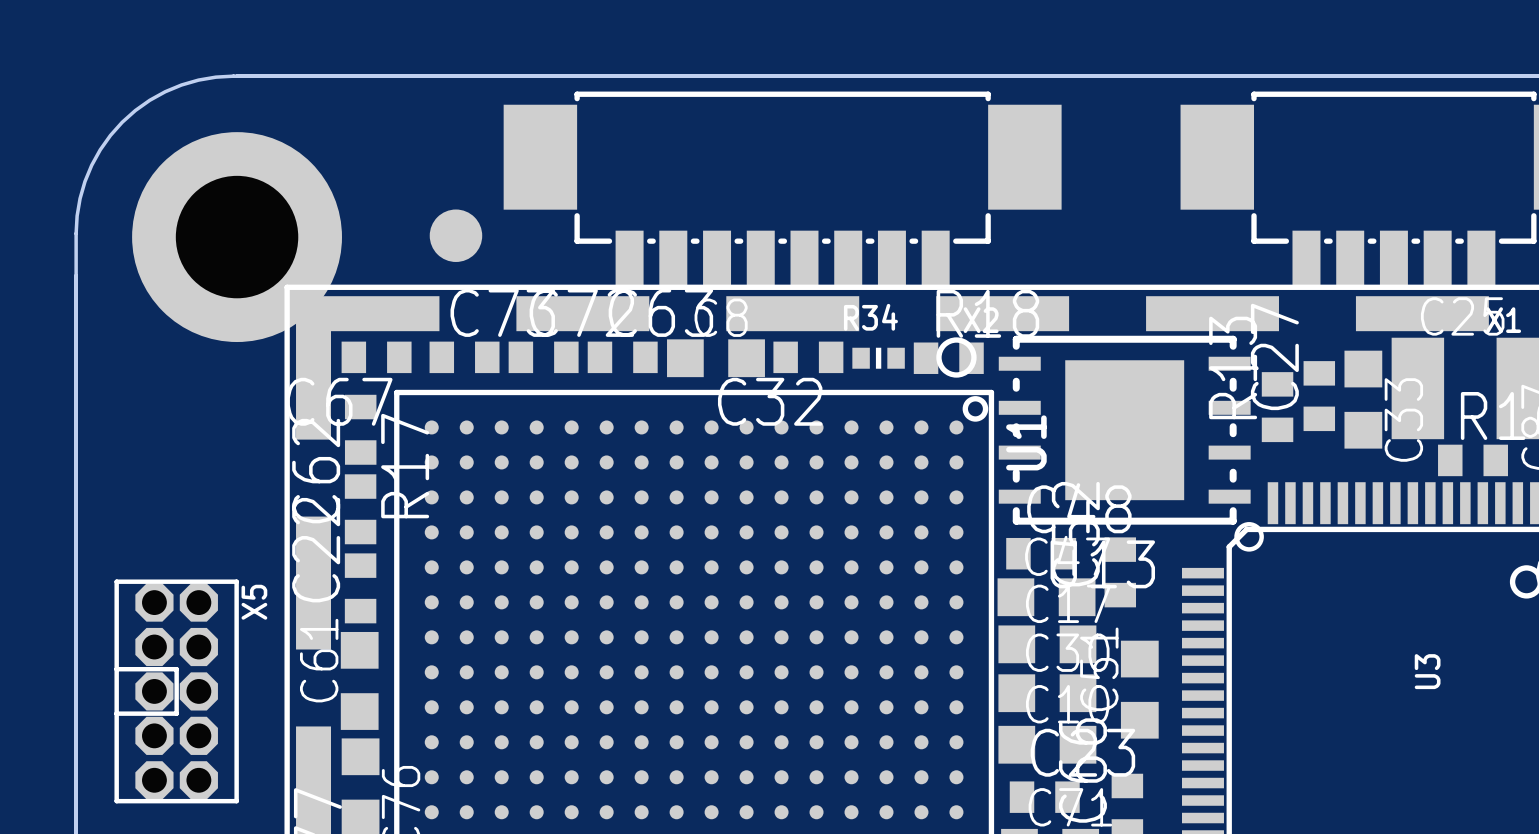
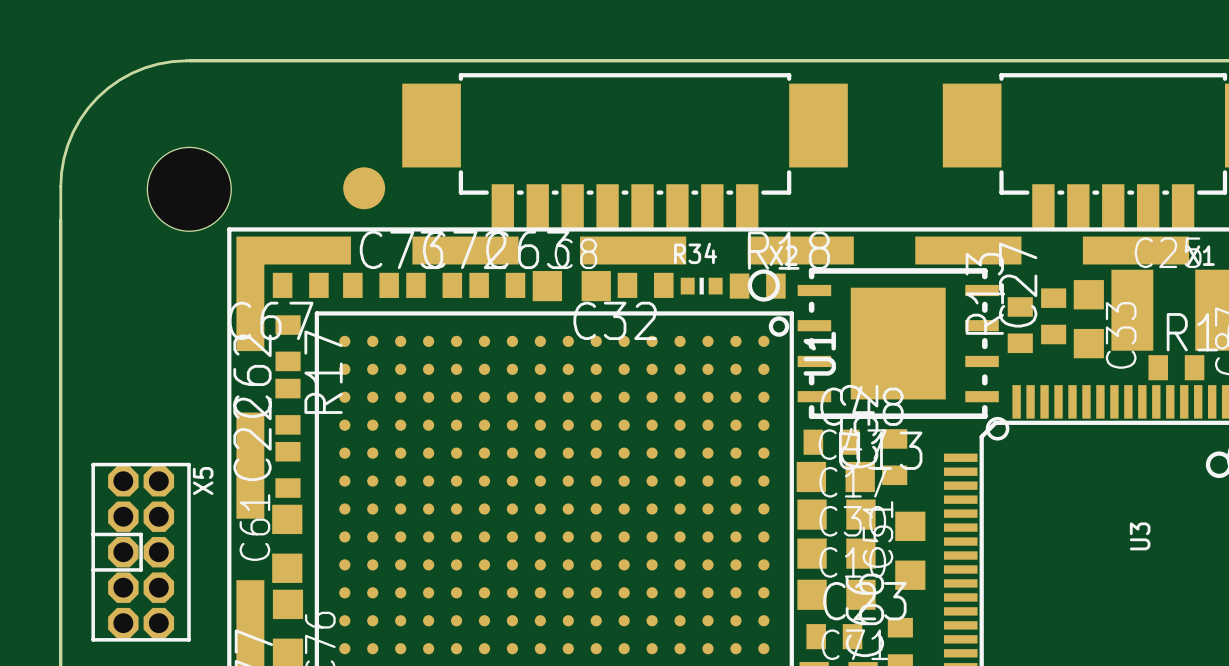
part: (237, 237) -> none
hole: none -> (189, 189)

